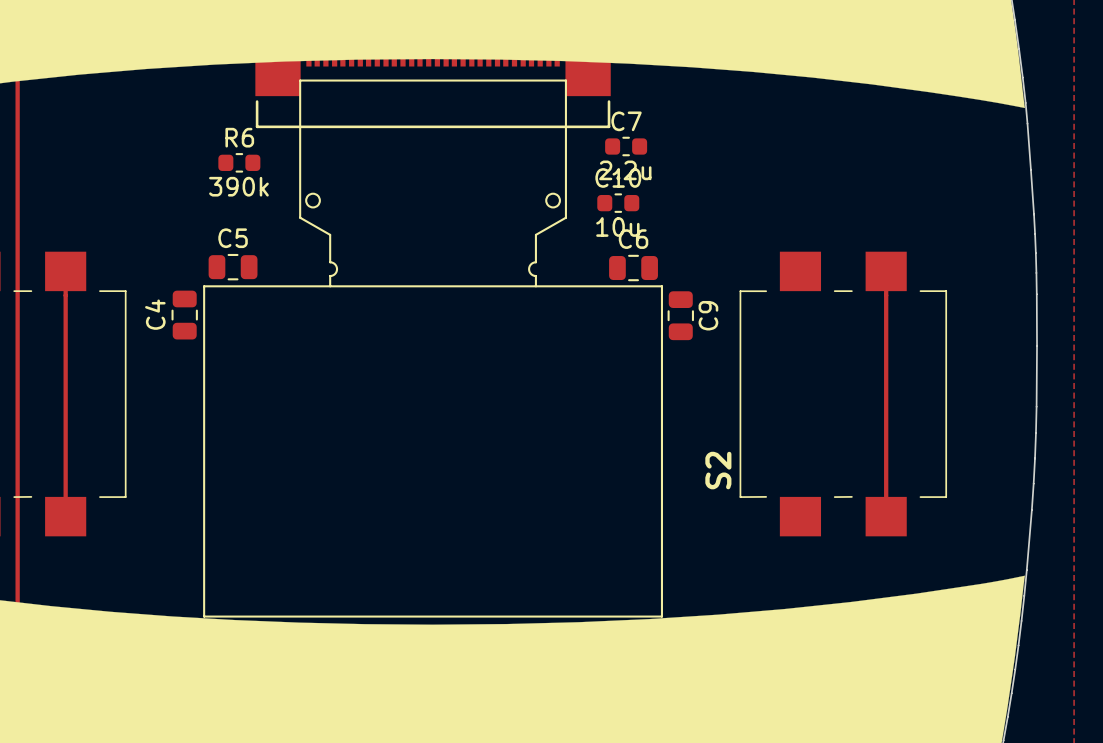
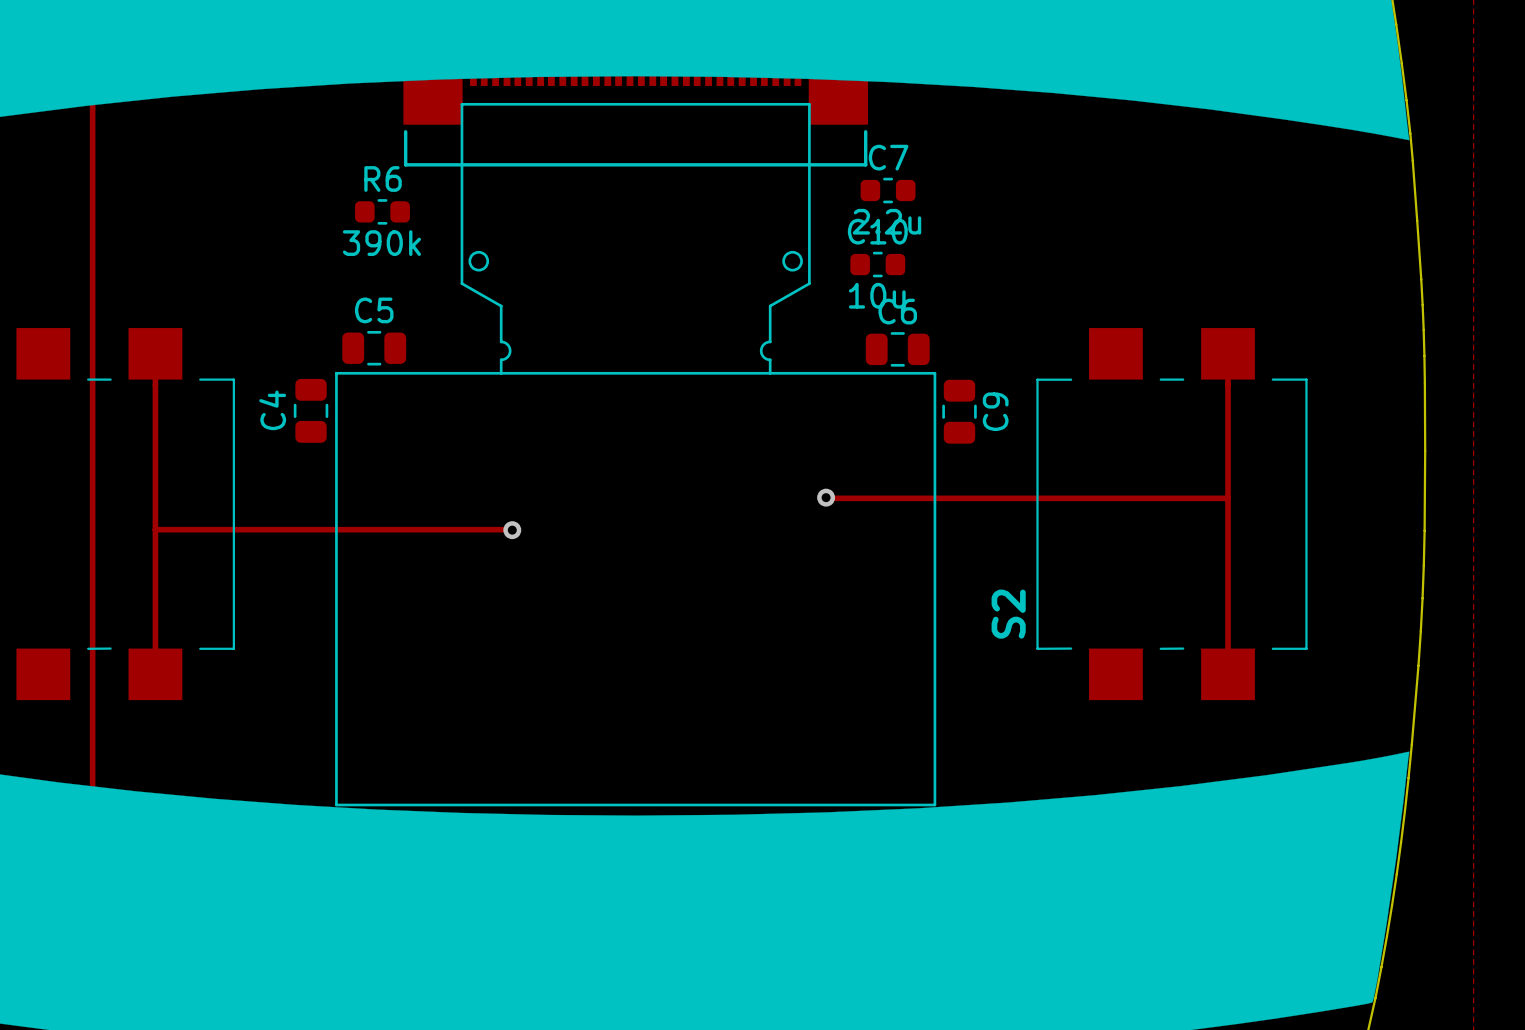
track: none -> (826, 497) (1228, 498)
via: none -> (826, 497)
track: none -> (155, 529) (512, 530)
via: none -> (512, 530)

